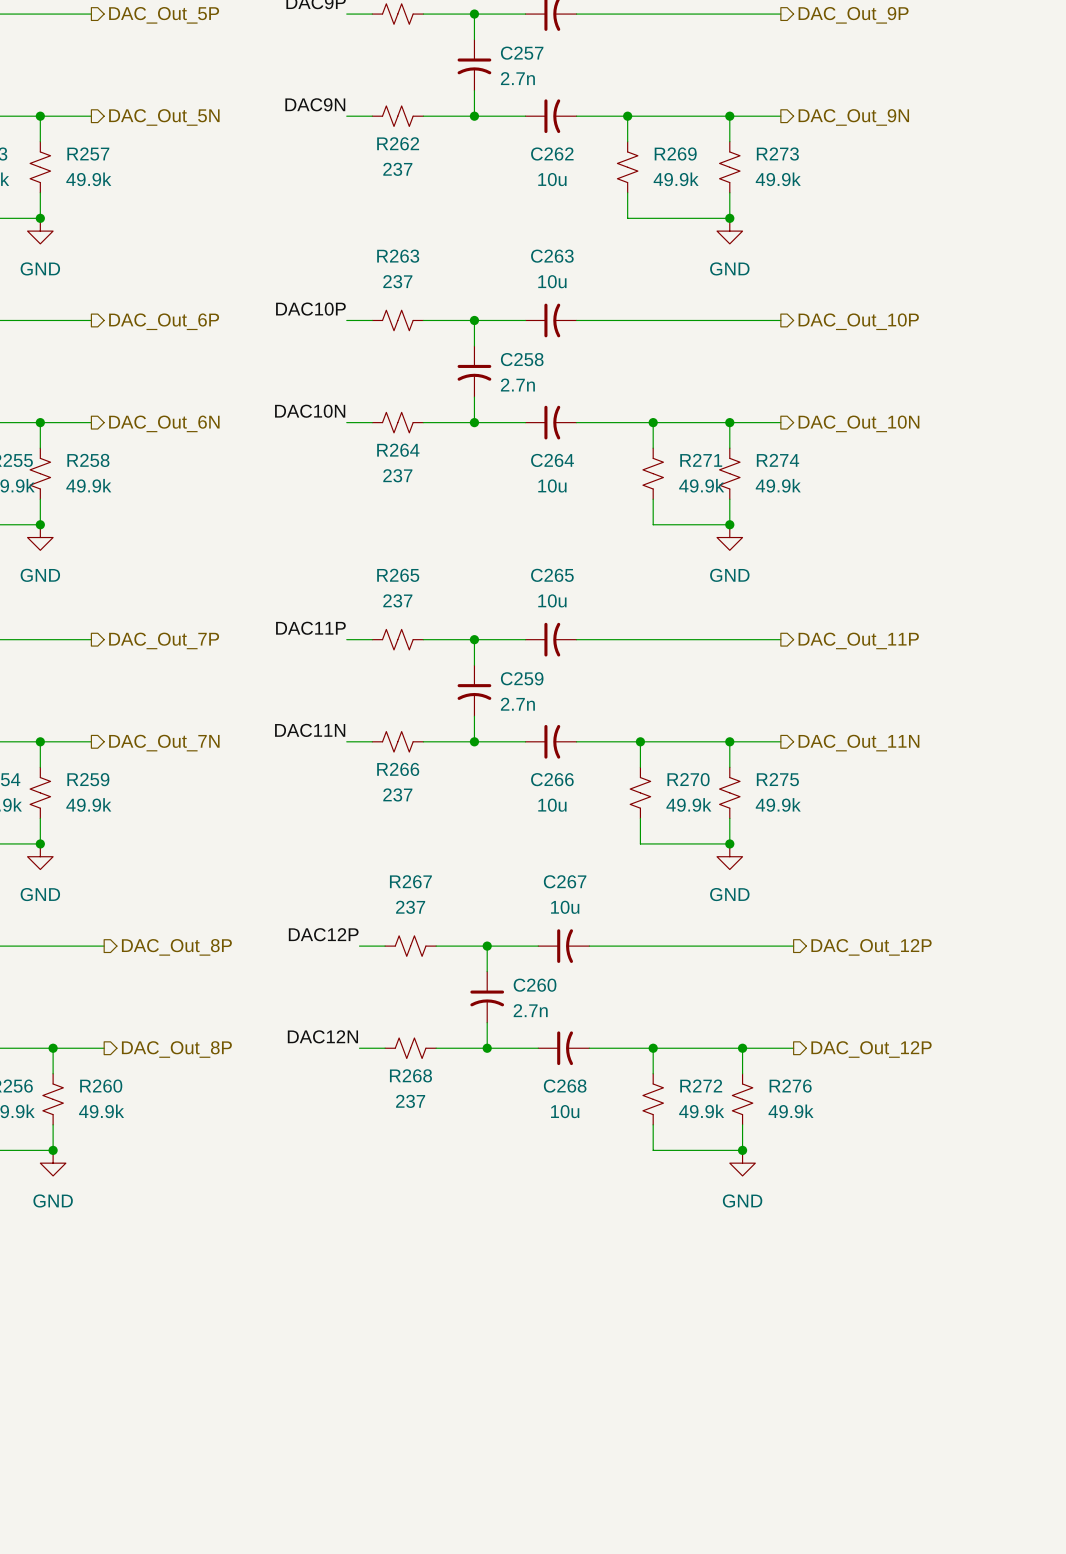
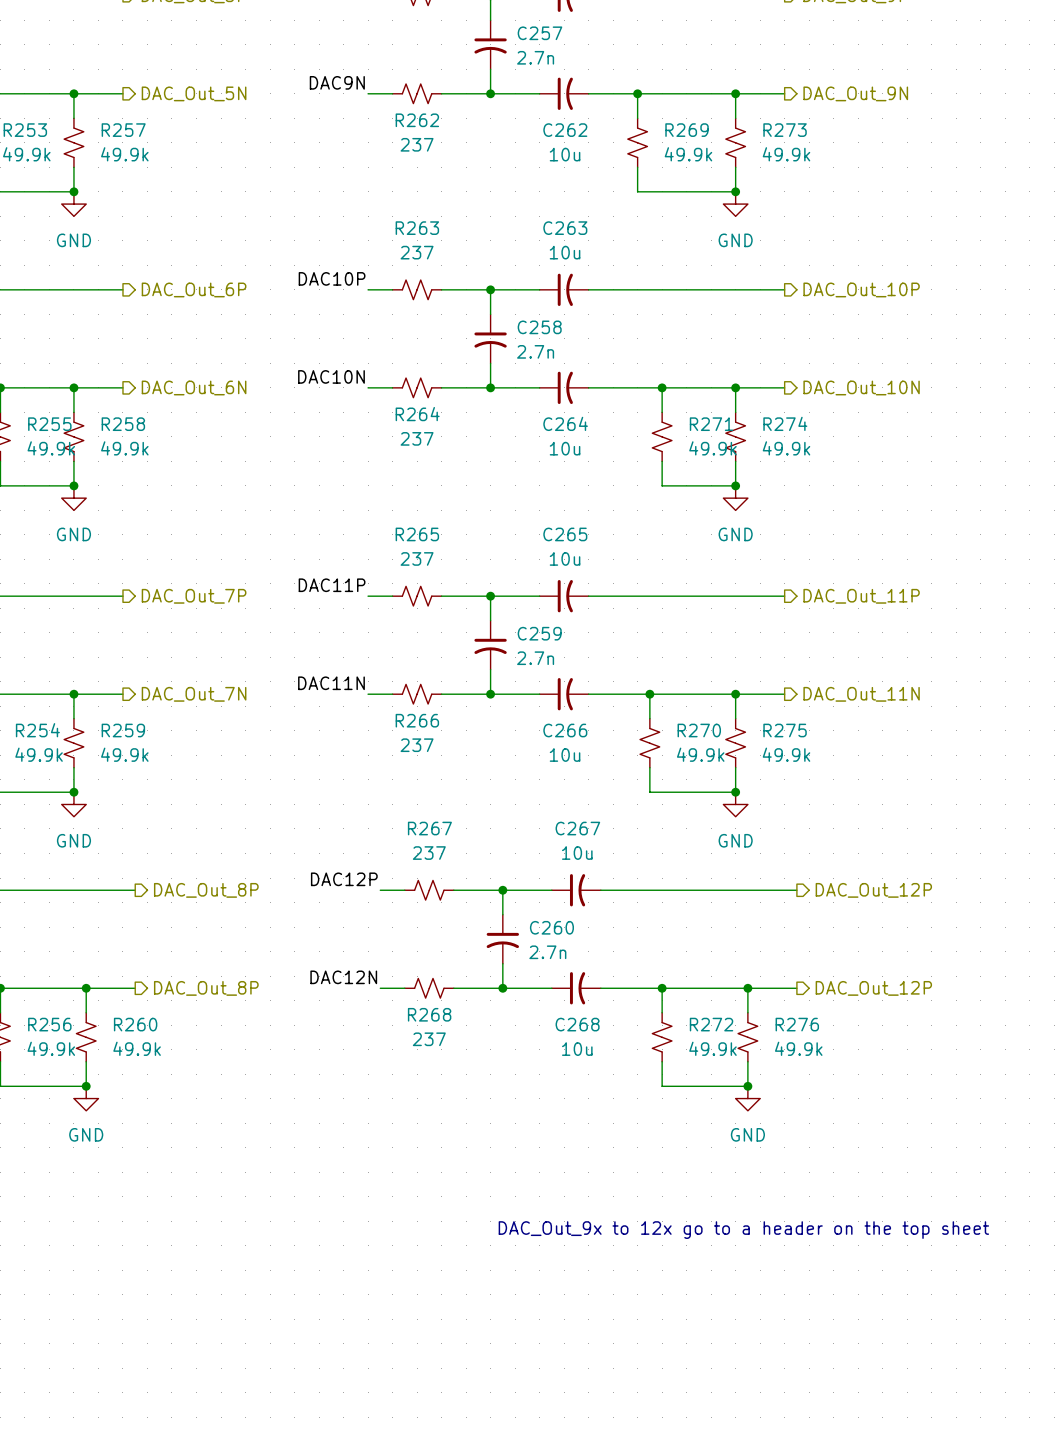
text: none -> DAC_Out_9x to 12x go to a header on the top sheet (743, 1230)

